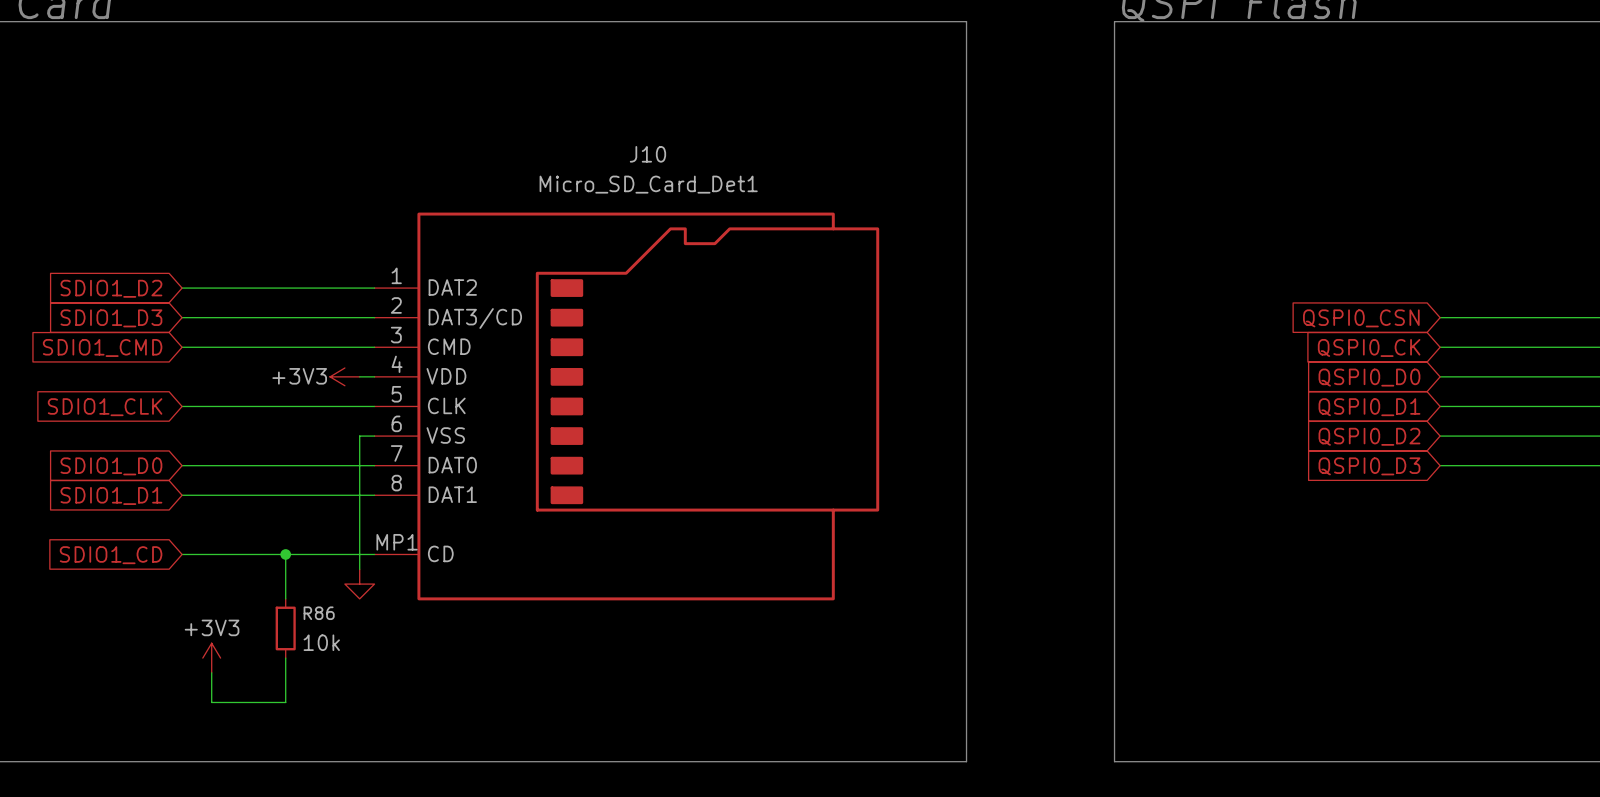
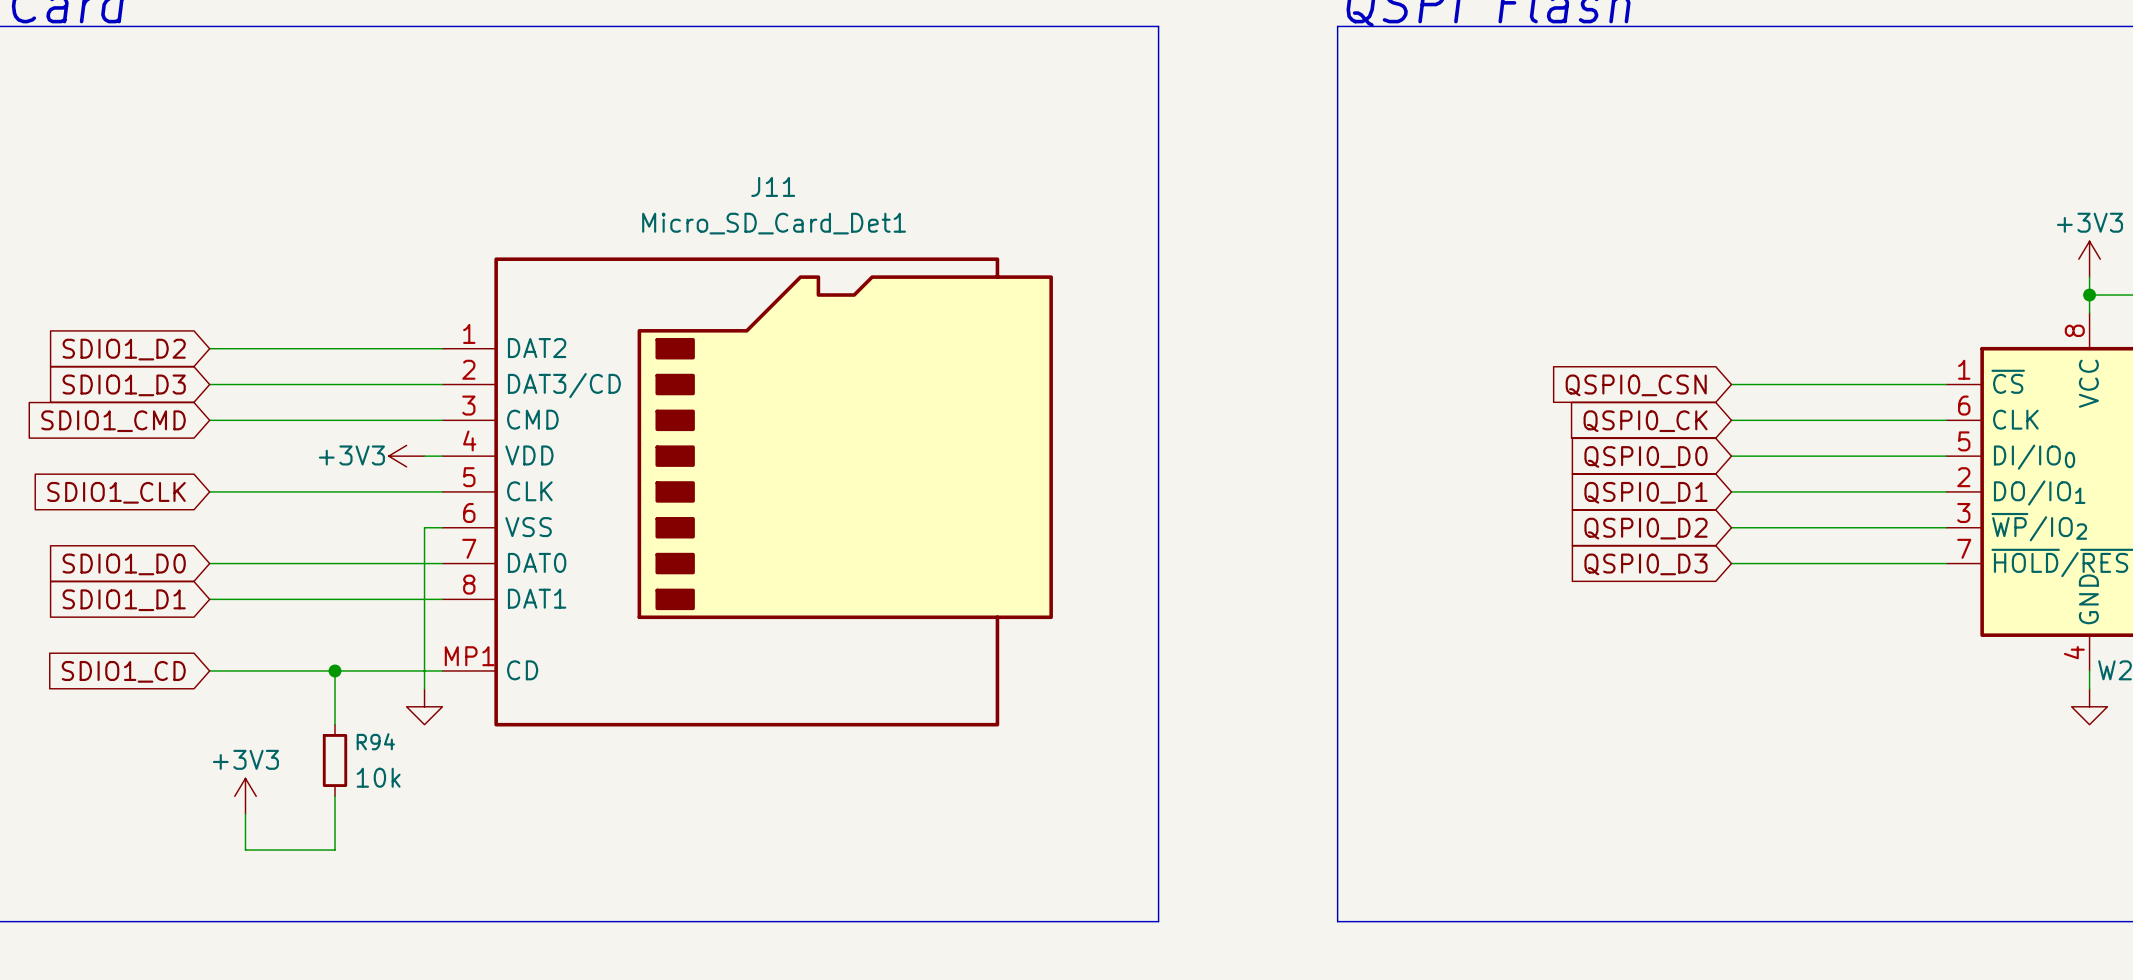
J10 name: J10 (647, 154) -> J11 (773, 186)
R86 name: R86 (319, 613) -> R94 (375, 741)

